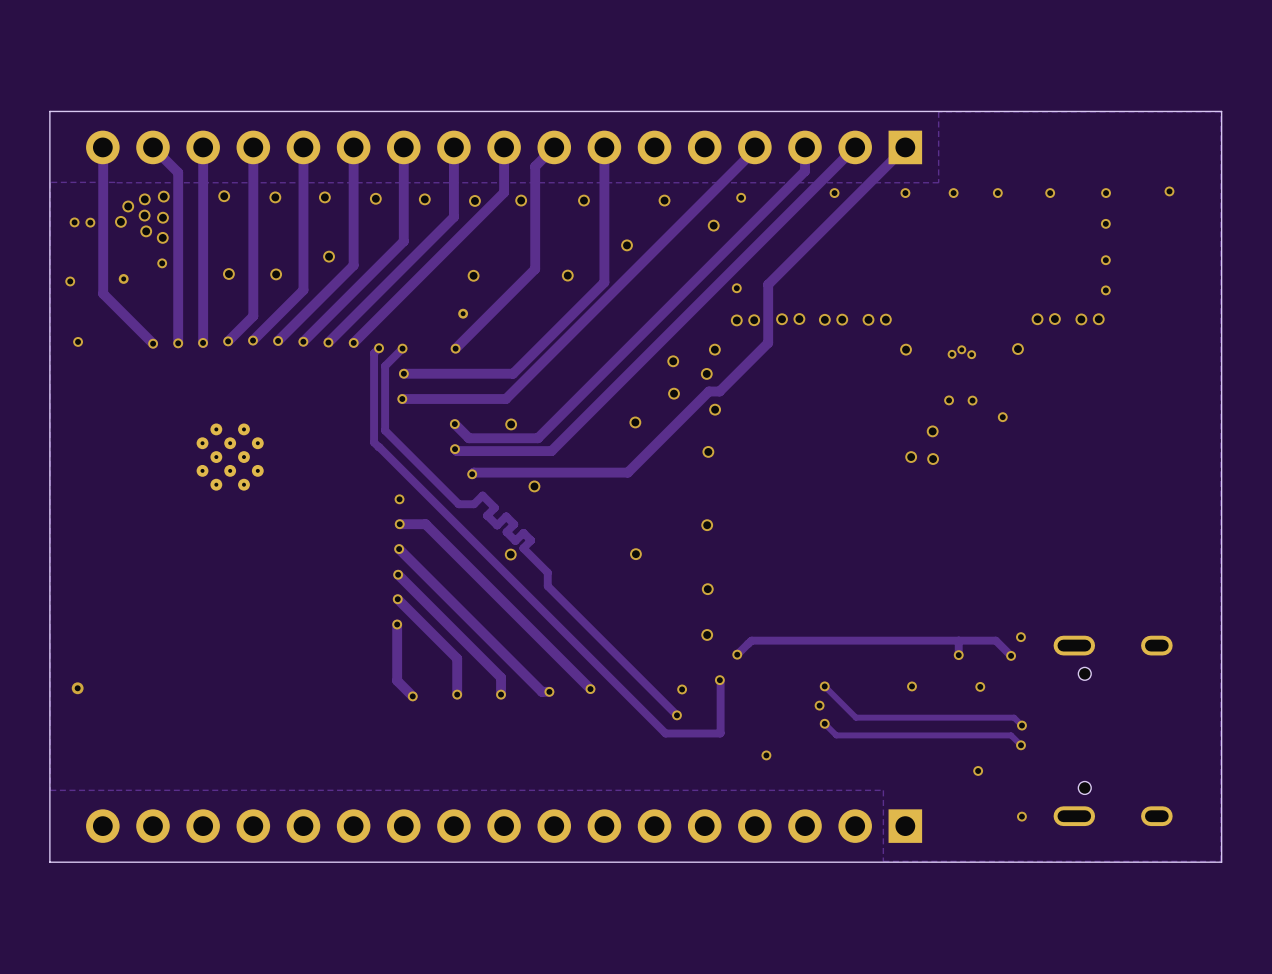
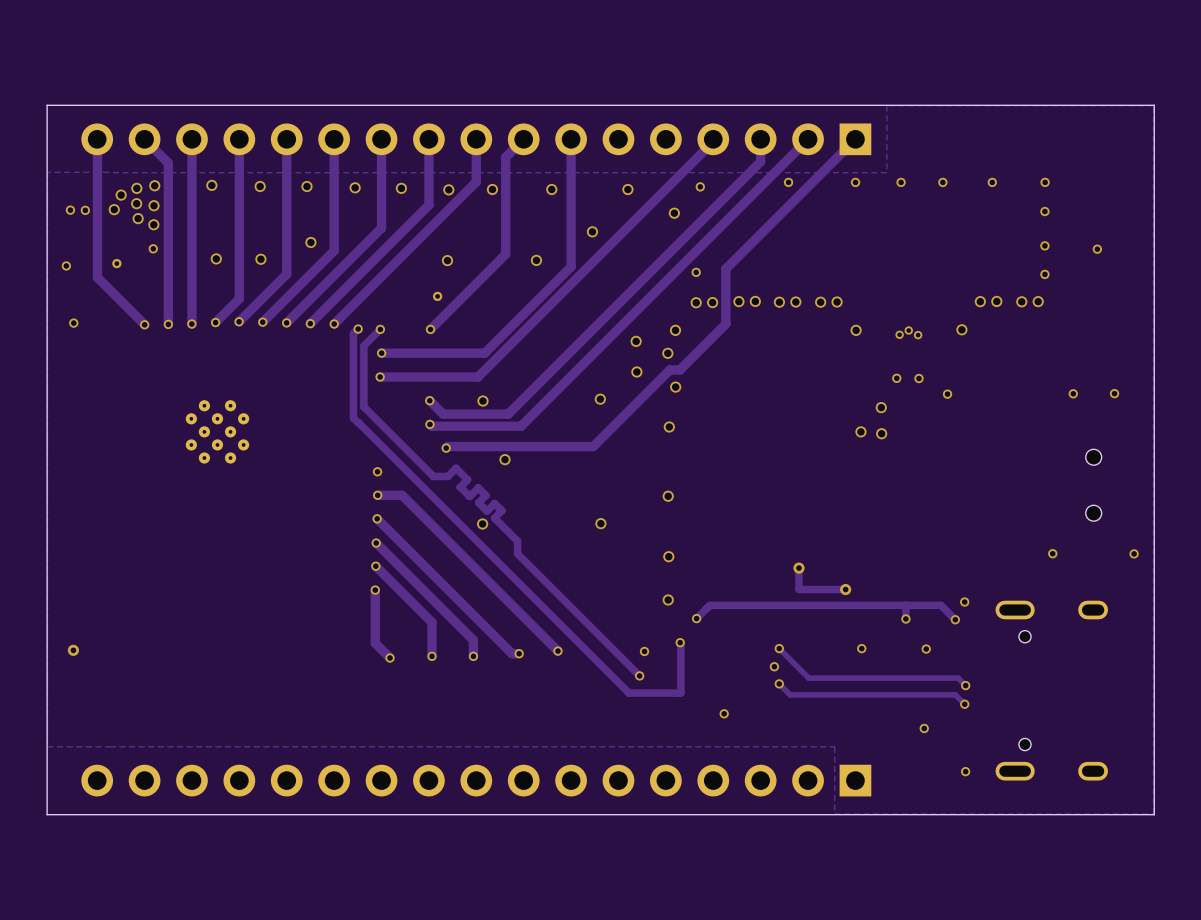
via position: (1169, 191) -> (1097, 249)
via: none -> (1073, 393)
via: none -> (1114, 393)
part: none -> (1093, 485)
via: none -> (1052, 553)
via: none -> (1134, 553)
track: none -> (799, 568) (799, 589) (845, 589)
via: none -> (799, 568)
via: none -> (845, 589)

